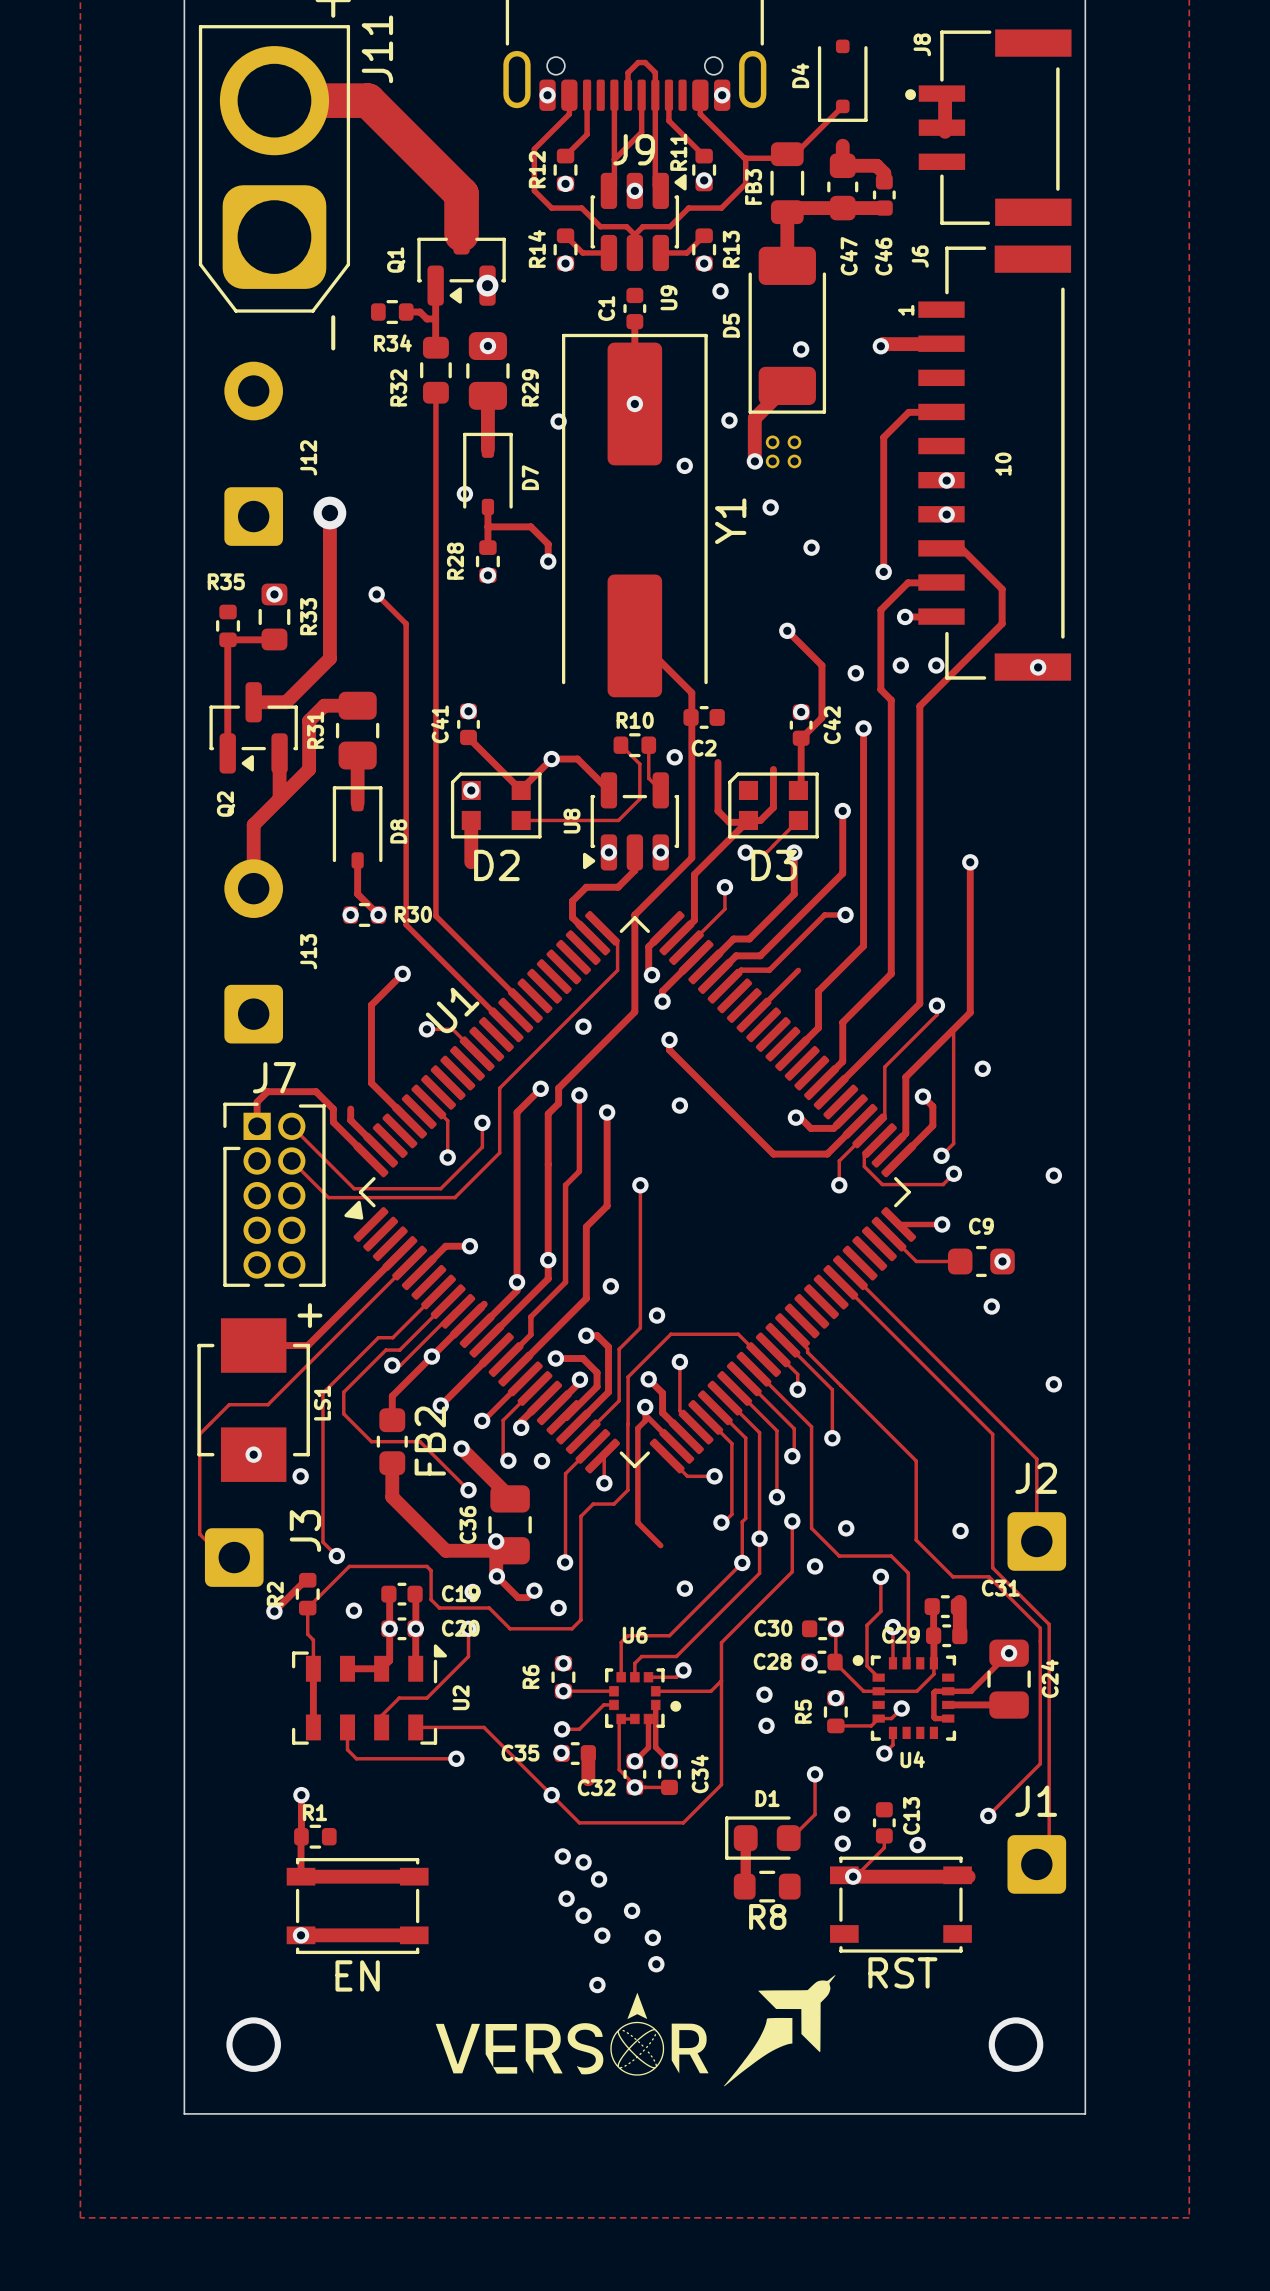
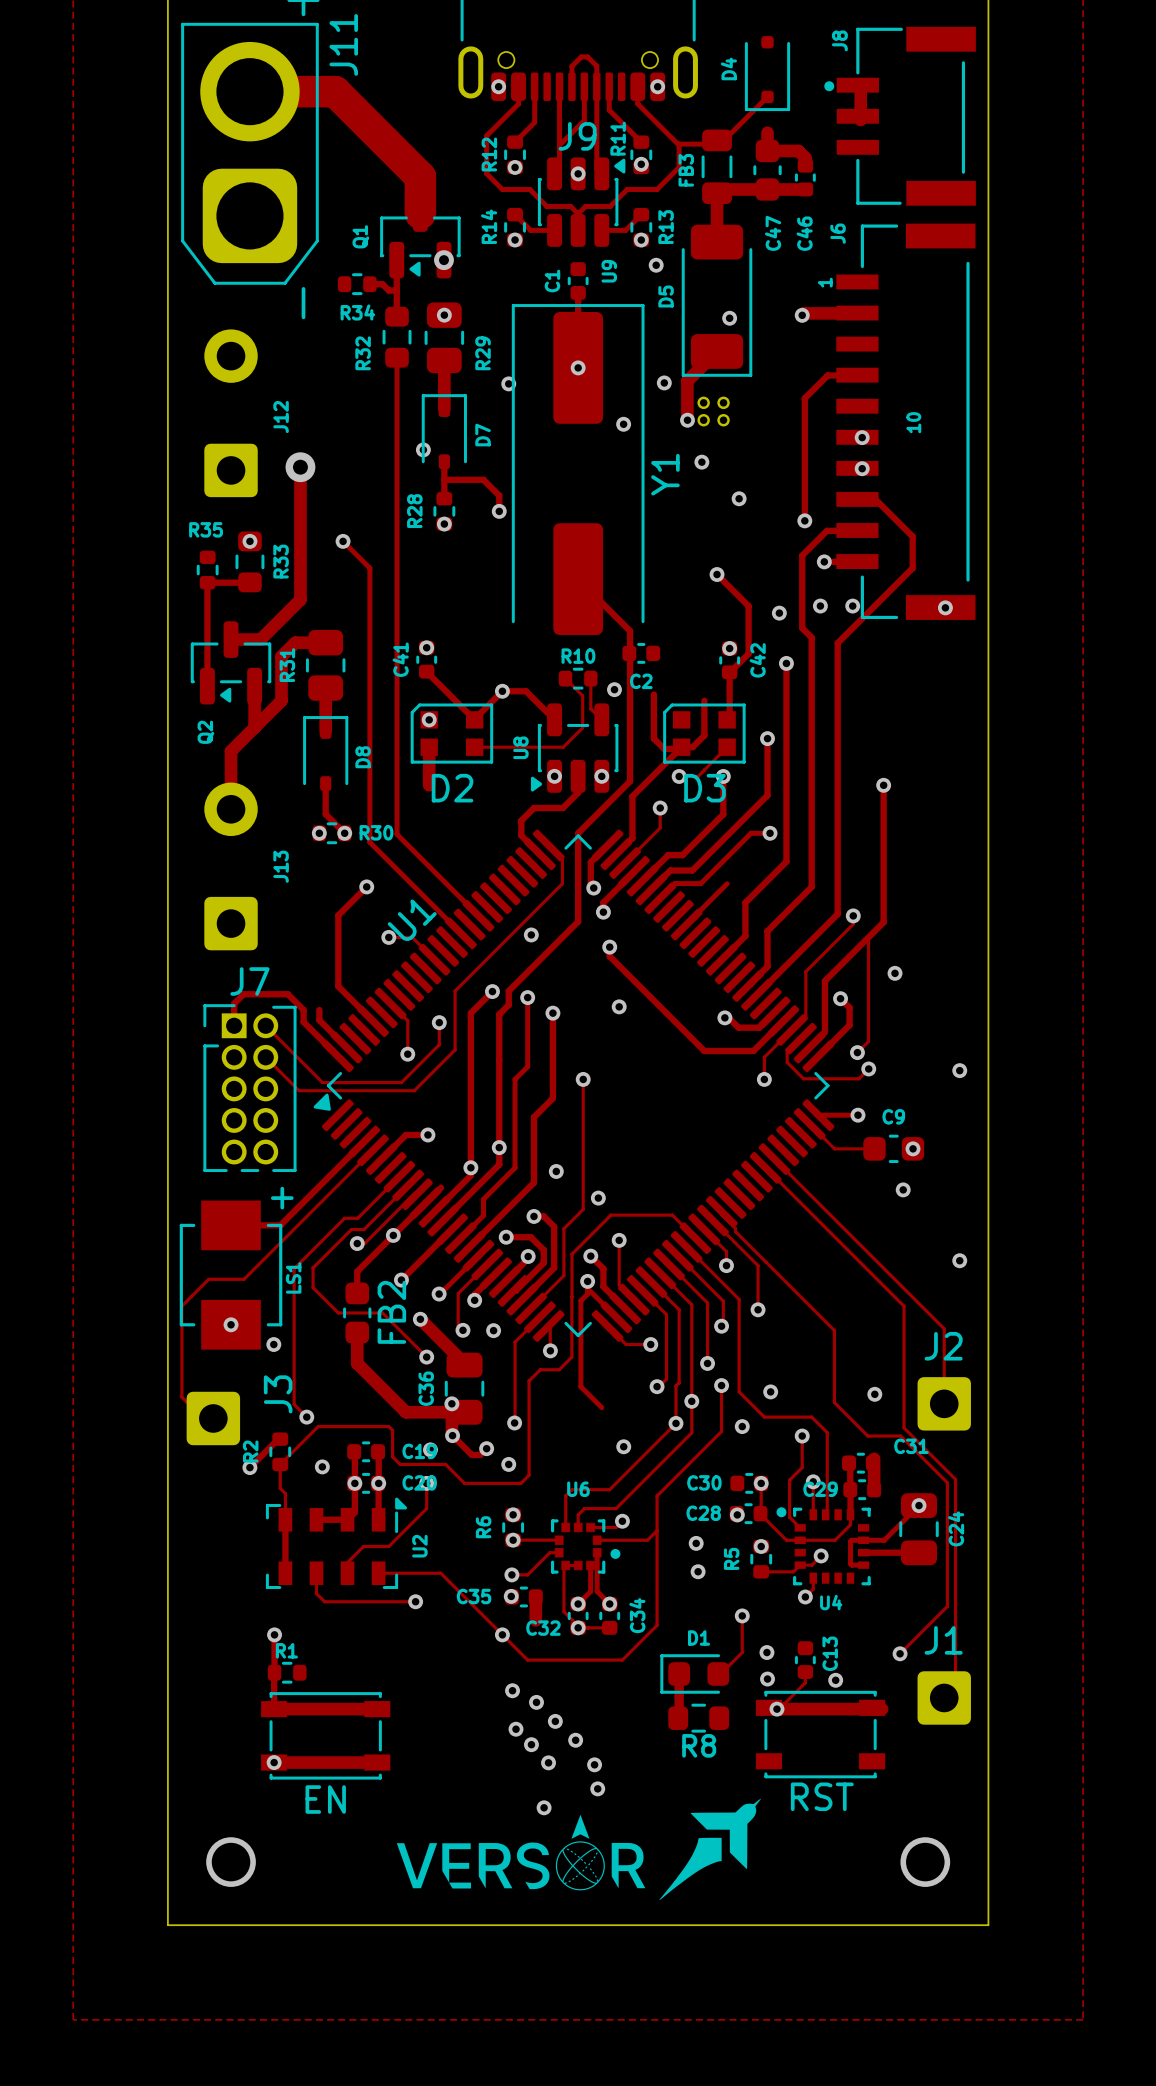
via: (583, 1862) -> none
via: none -> (536, 1702)
via: (599, 1879) -> none
via: none -> (555, 1721)

